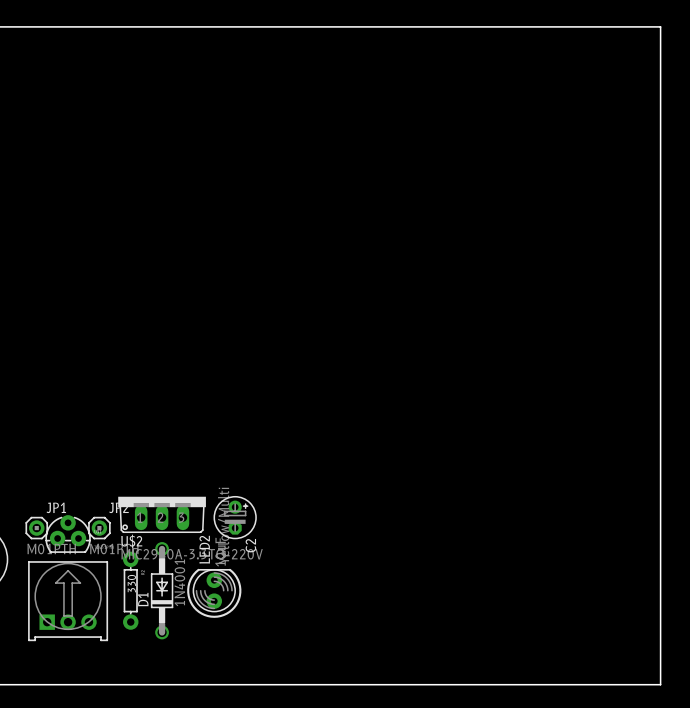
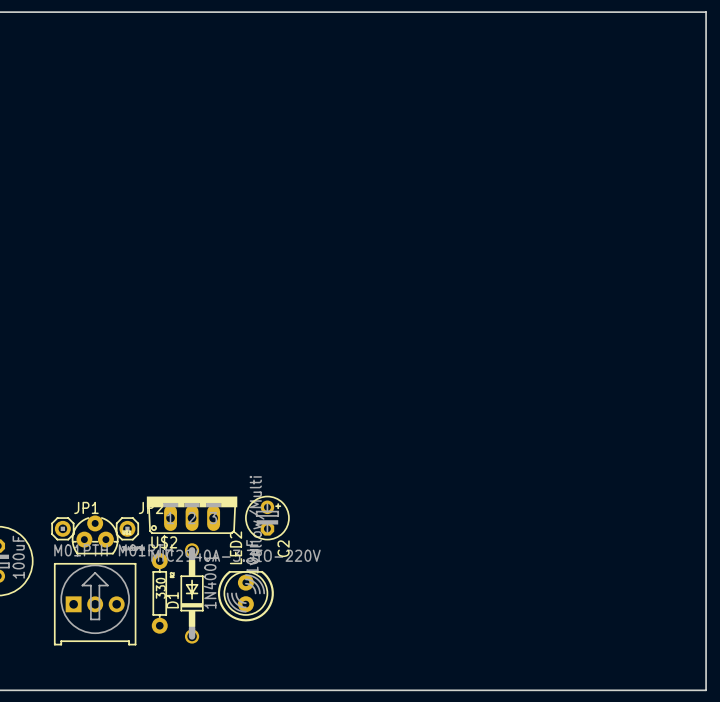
part footprint: [28, 561, 109, 642] -> [53, 562, 137, 646]

